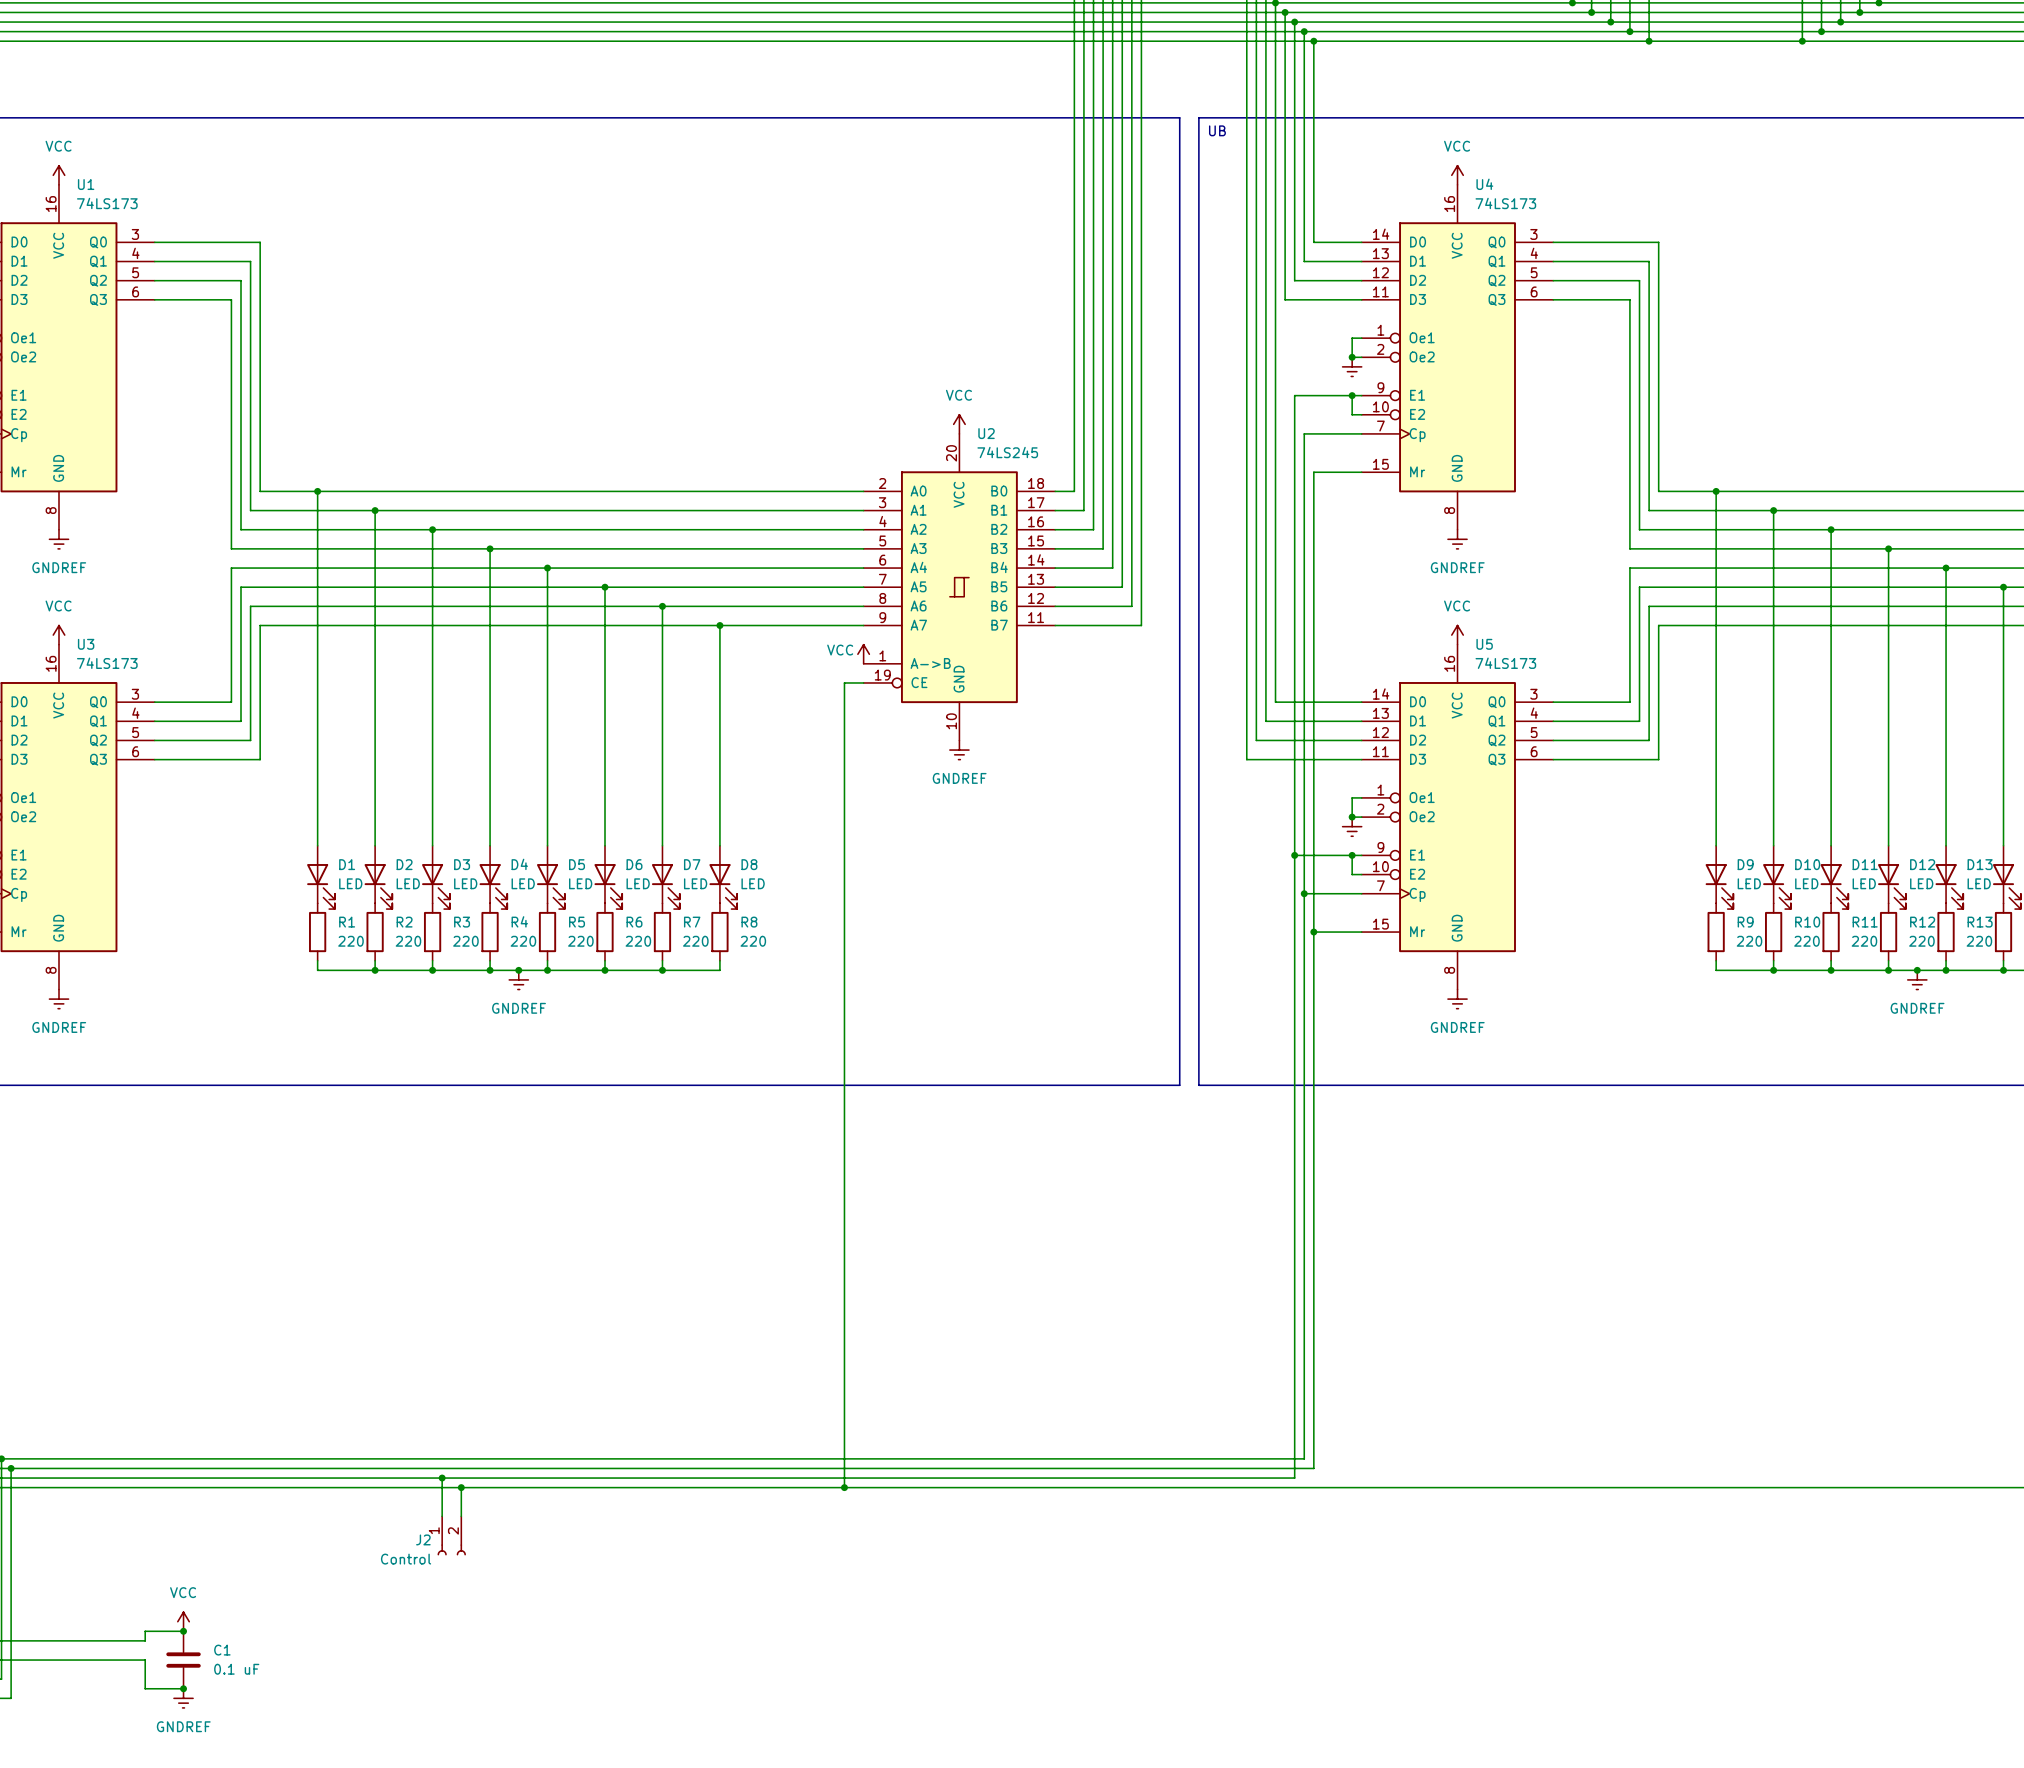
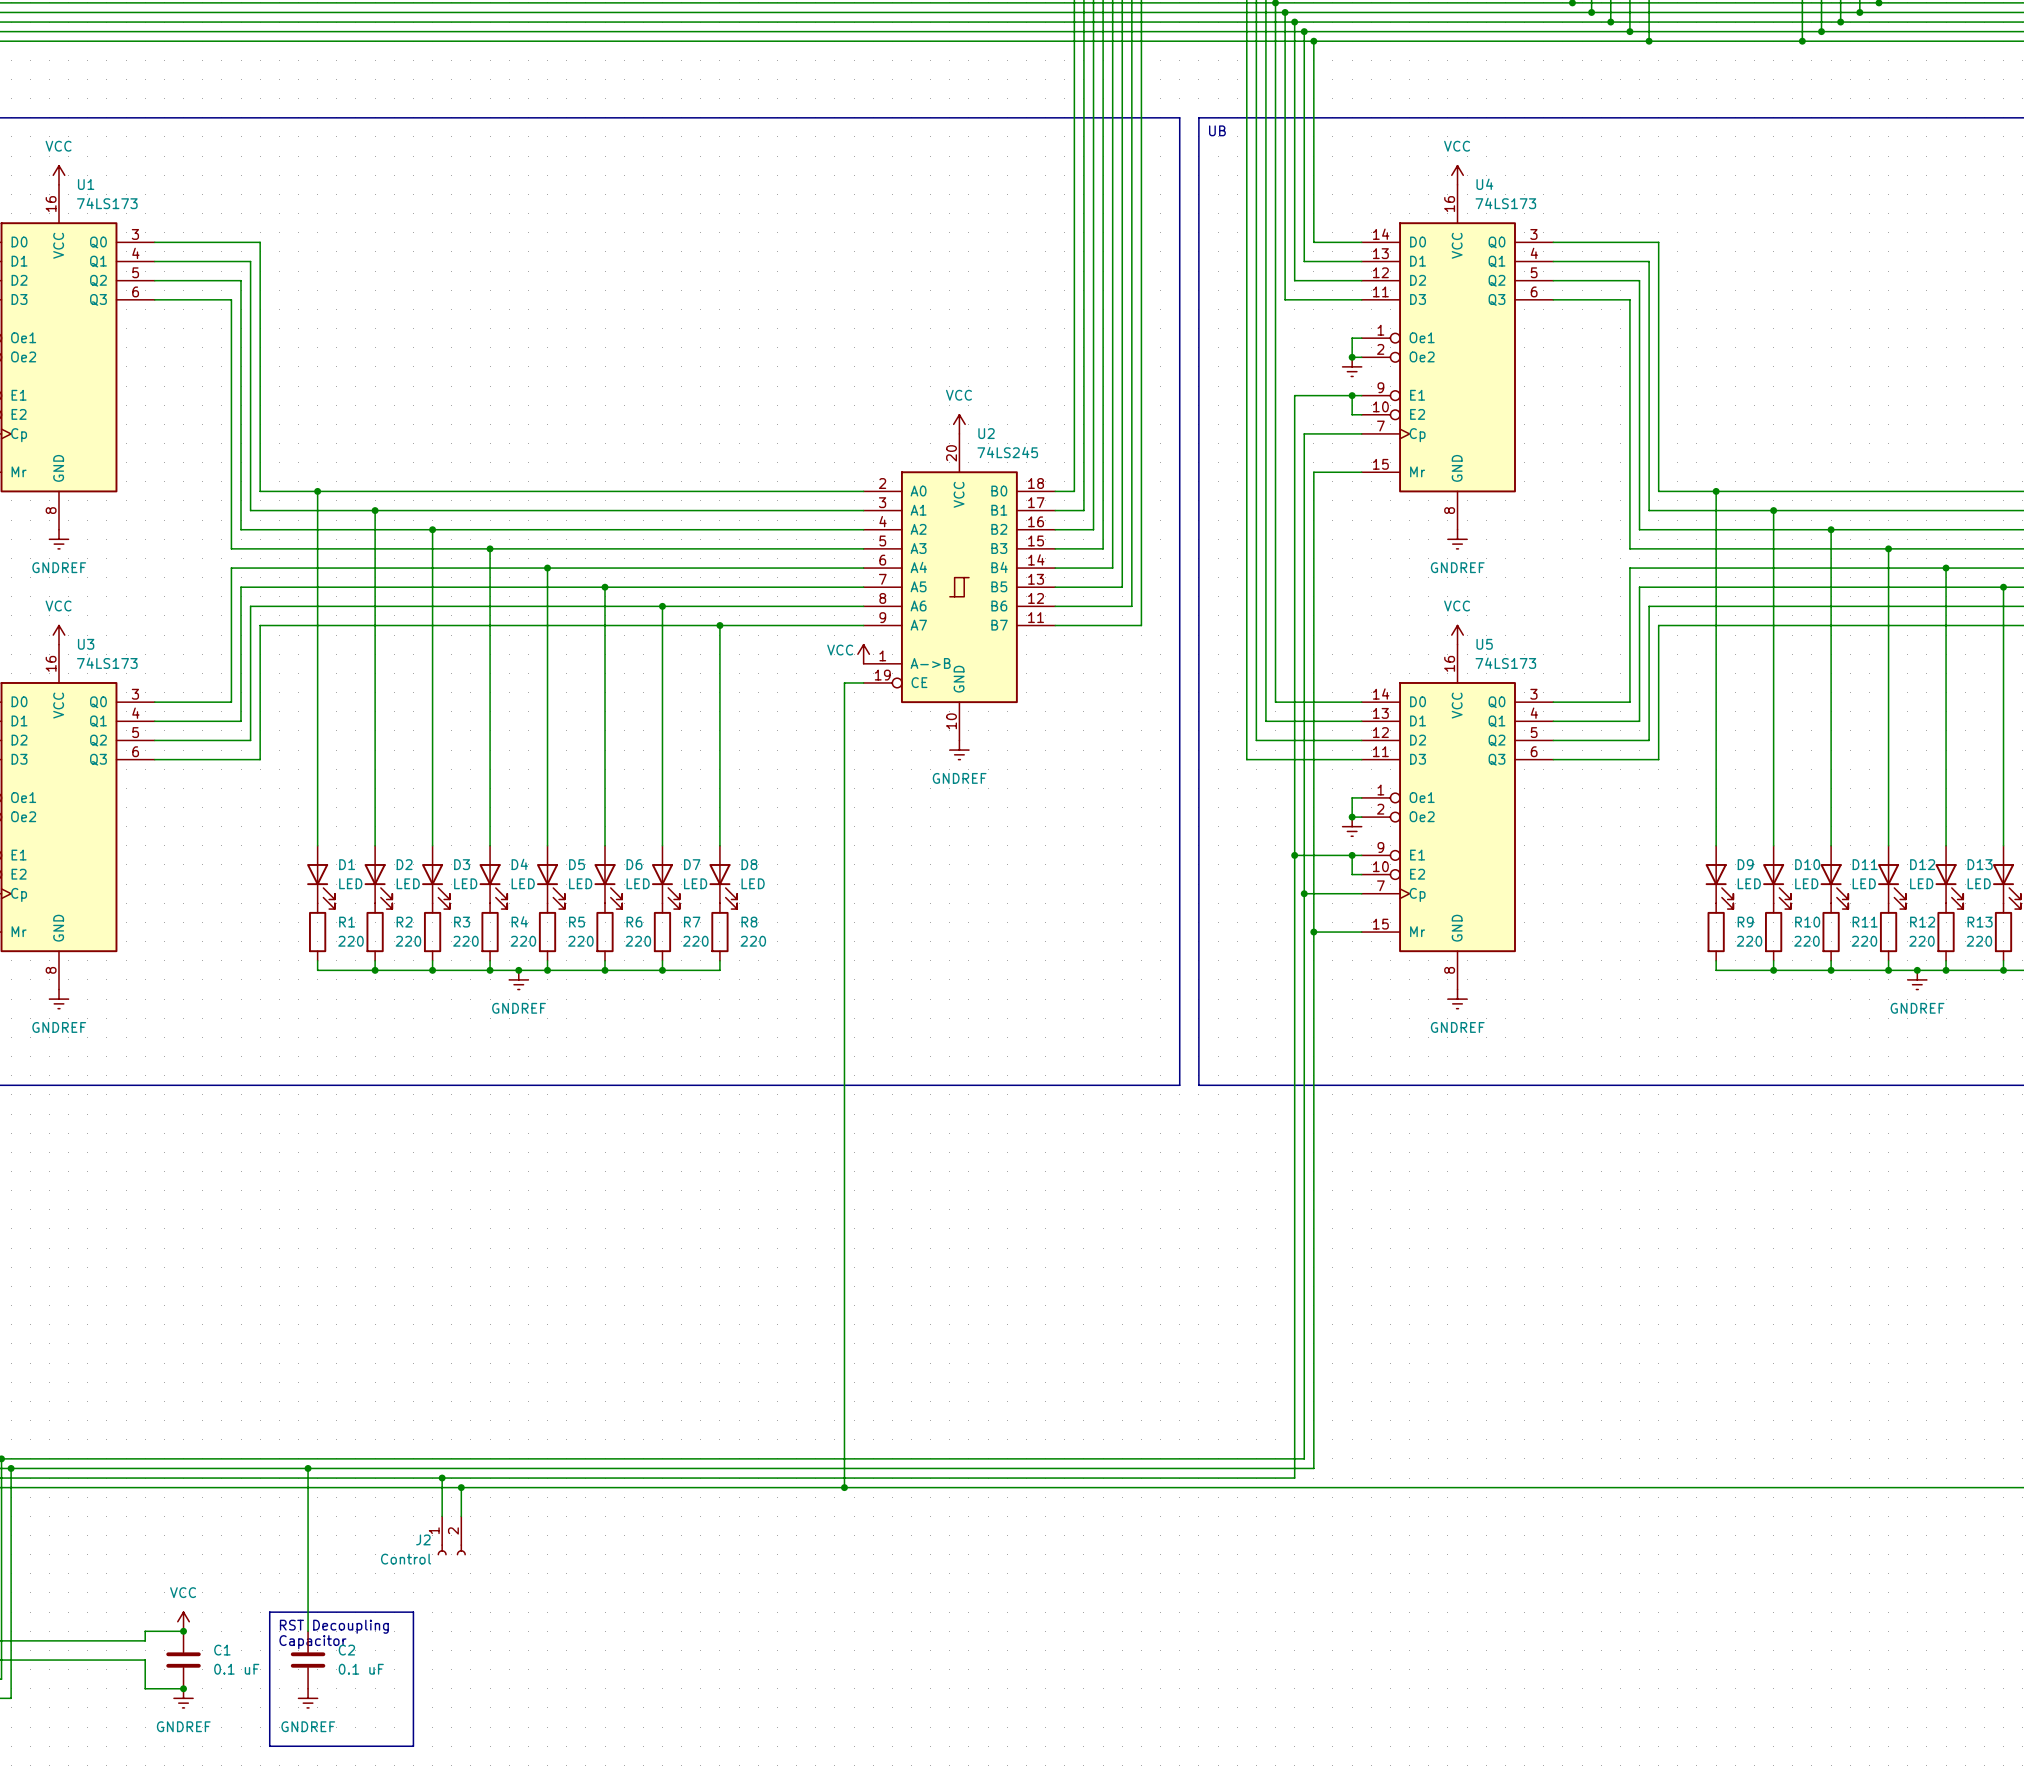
wire: none -> (308, 1468) (308, 1631)
junction: none -> (308, 1468)
line: none -> (269, 1612) (413, 1612) (413, 1746) (269, 1746) (269, 1612)
text: none -> RST Decoupling (334, 1626)
text: none -> Capacitor (312, 1642)
C2: none -> 0.1 uF (308, 1660)
power symbol: none -> GNDREF (308, 1698)

